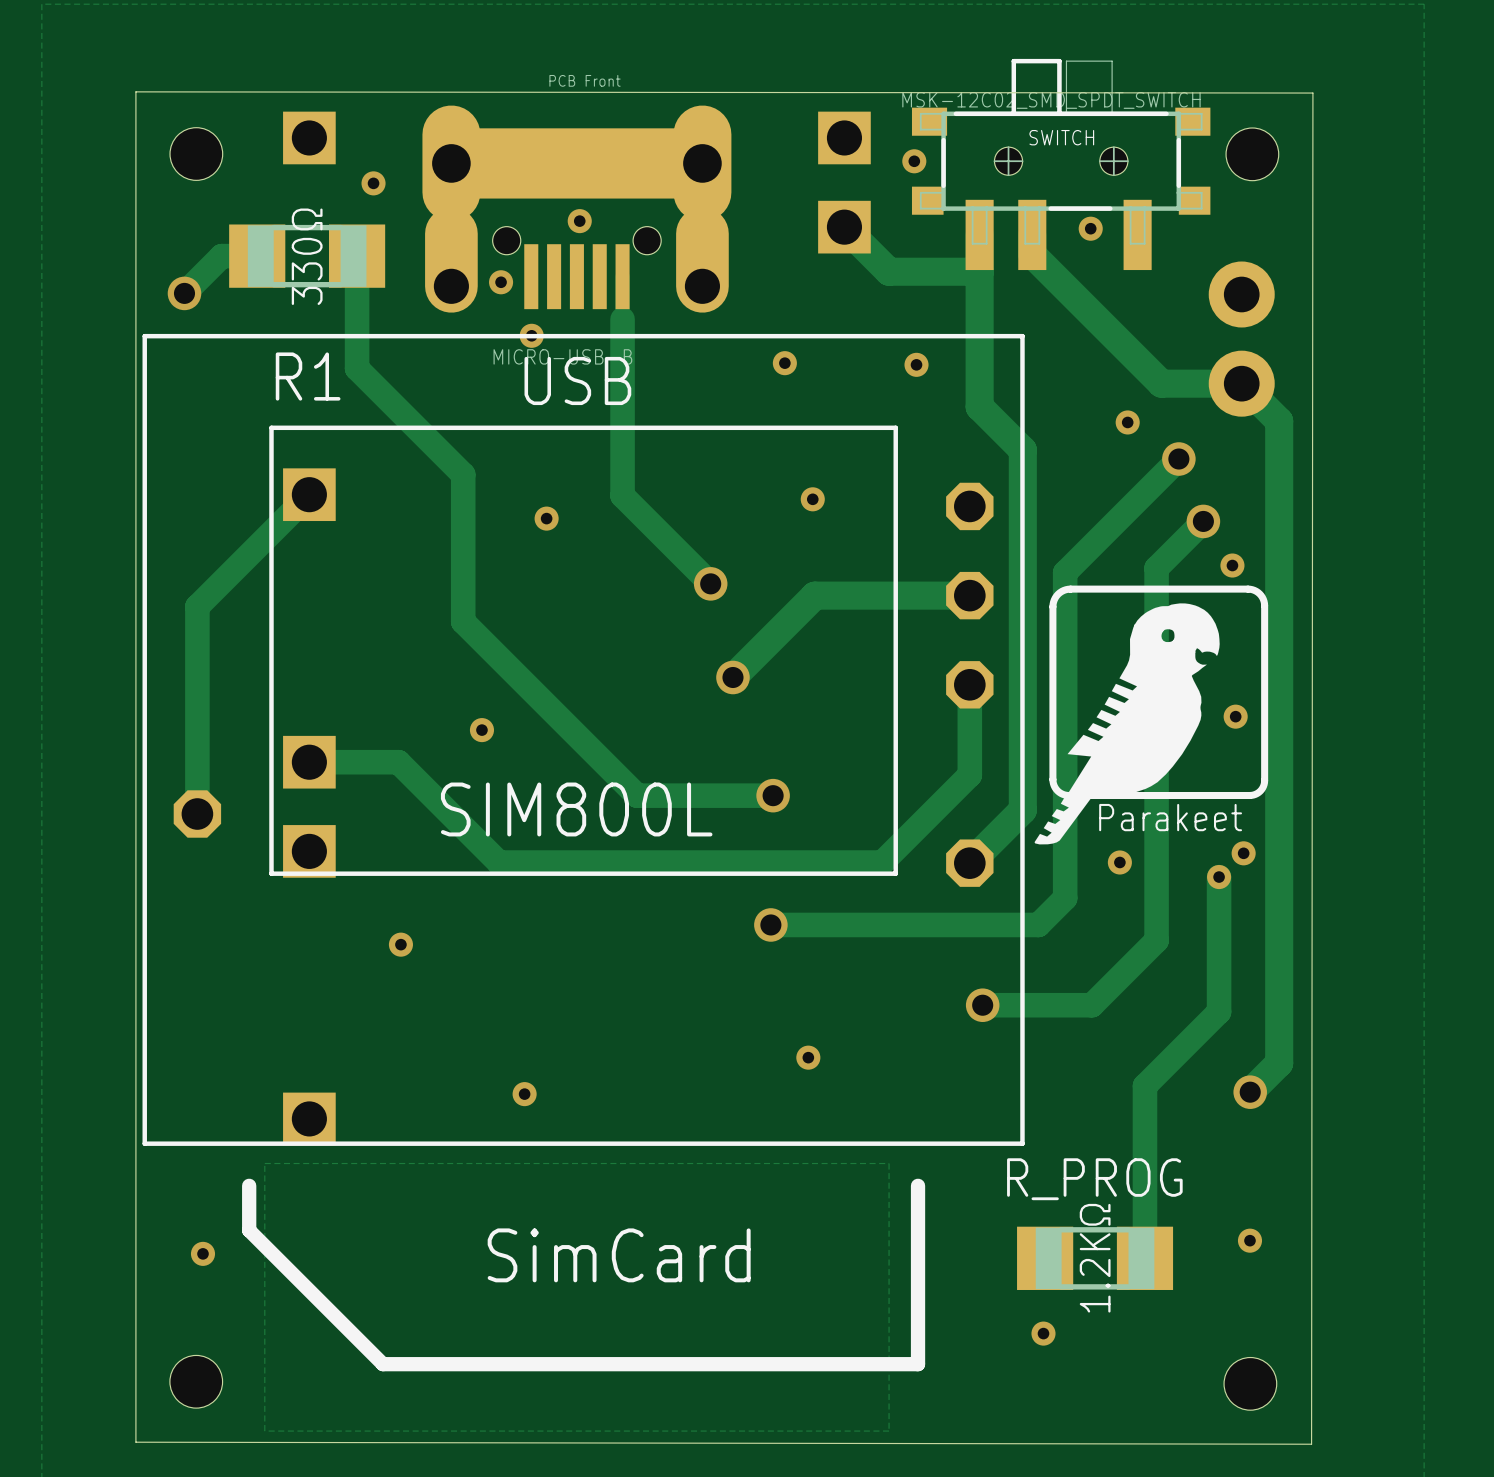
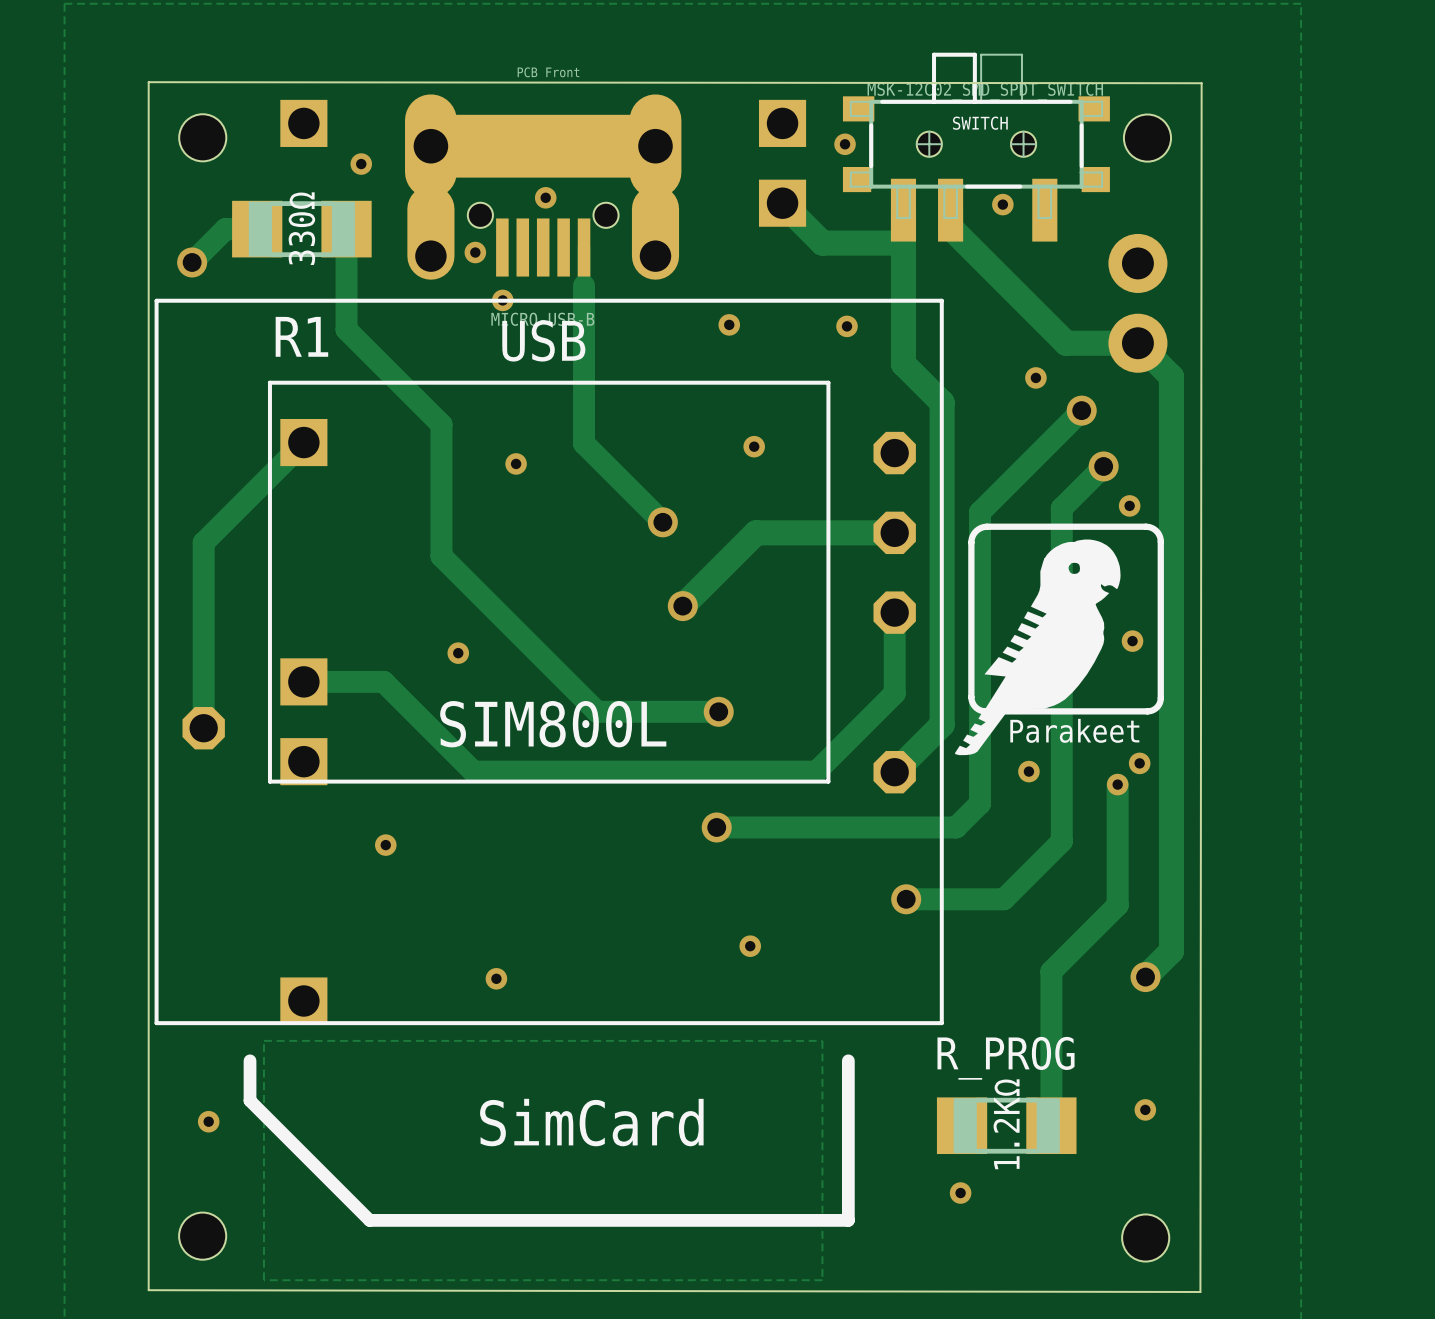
drawing shape: [1034, 585, 1269, 845] -> [955, 523, 1164, 756]

